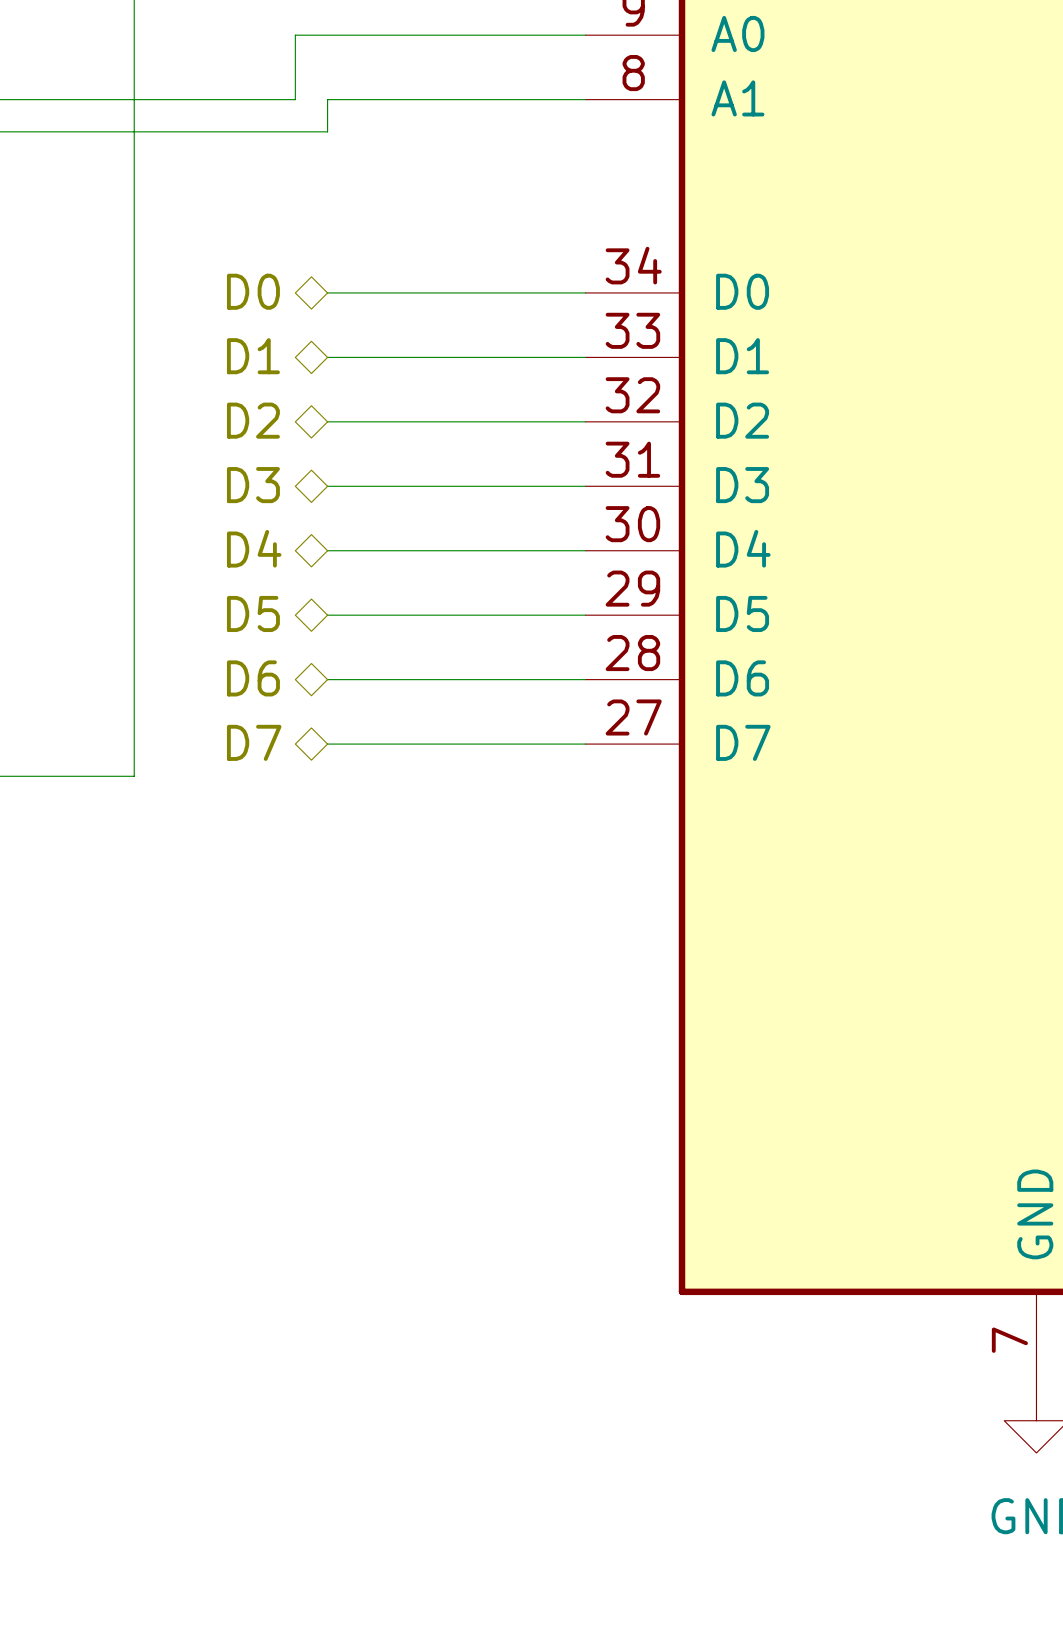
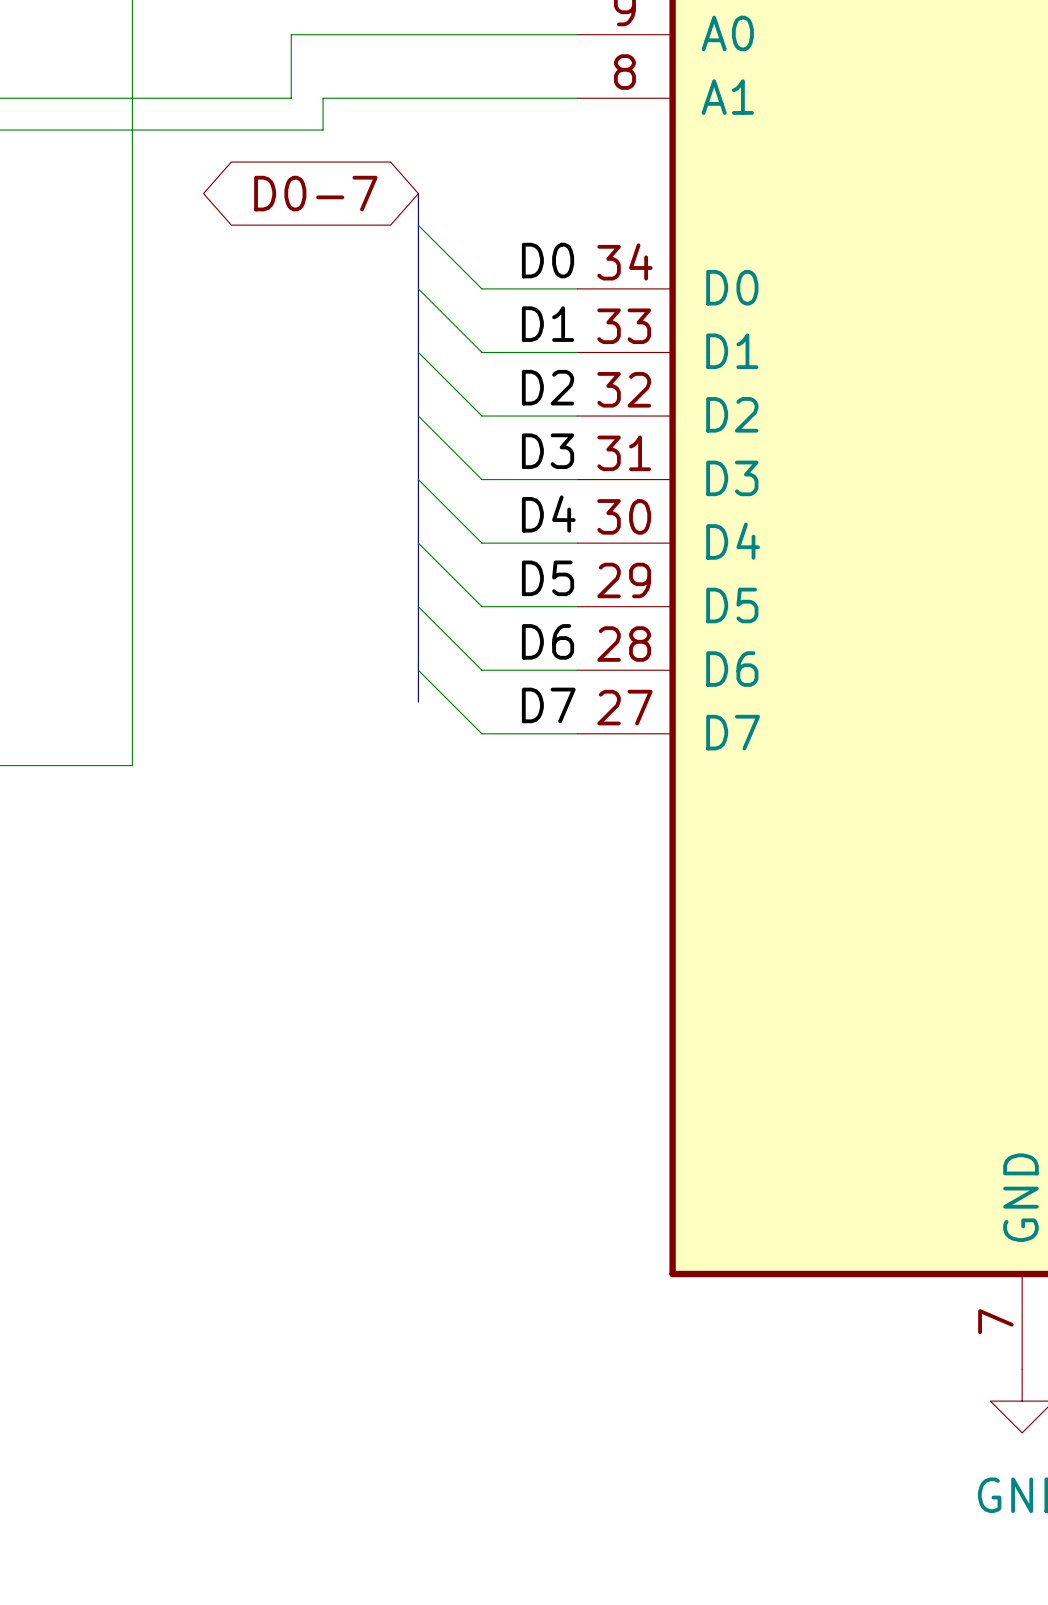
global label: none -> D0-7 (315, 193)
bus: none -> (418, 193) (418, 702)
label: none -> D0 (548, 260)
hierarchical label: D0 (253, 291) -> none
wire: (327, 292) (488, 292) -> (418, 225) (481, 288)
label: none -> D1 (548, 324)
hierarchical label: D1 (253, 356) -> none
wire: (327, 357) (488, 357) -> (418, 288) (481, 352)
label: none -> D2 (548, 387)
hierarchical label: D2 (253, 420) -> none
wire: (327, 421) (488, 421) -> (418, 352) (481, 416)
label: none -> D3 (548, 451)
hierarchical label: D3 (253, 485) -> none
wire: (327, 486) (488, 486) -> (418, 416) (481, 479)
label: none -> D4 (548, 514)
hierarchical label: D4 (254, 548) -> none
wire: (327, 550) (488, 550) -> (418, 479) (481, 543)
label: none -> D5 (548, 578)
hierarchical label: D5 (253, 613) -> none
wire: (327, 615) (488, 615) -> (418, 543) (481, 606)
label: none -> D6 (548, 641)
hierarchical label: D6 (253, 678) -> none
wire: (327, 679) (488, 679) -> (418, 606) (481, 670)
label: none -> D7 (548, 705)
hierarchical label: D7 (254, 742) -> none
wire: (327, 744) (488, 744) -> (418, 670) (481, 733)

